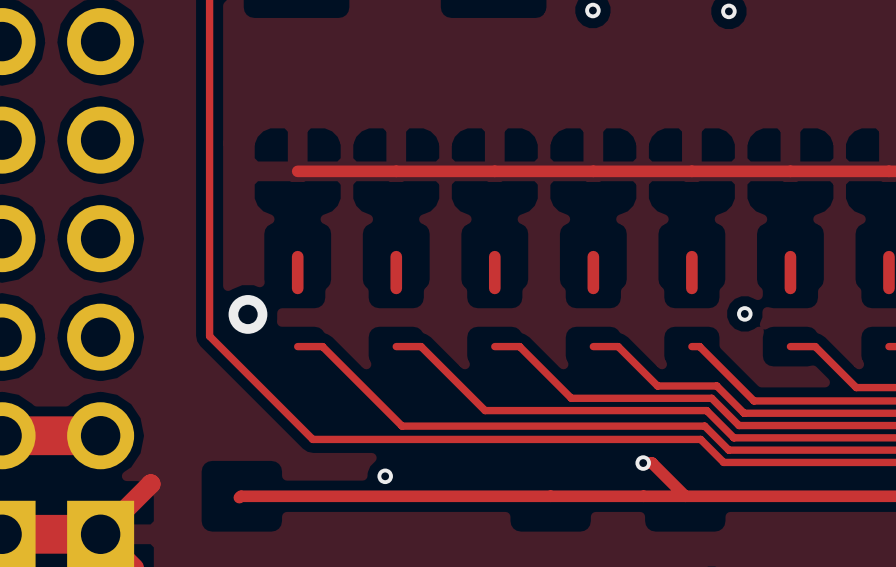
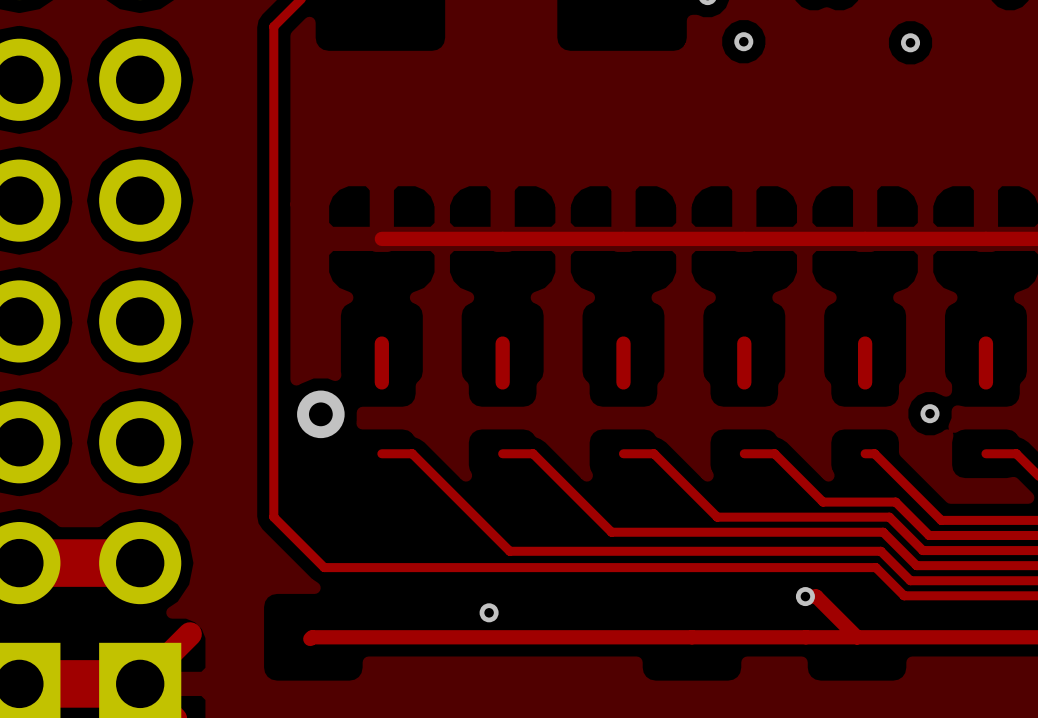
track: (209, 336) (312, 439) -> (273, 441) (273, 517) (324, 567) (400, 567)
track: (150, 484) (141, 493) -> none

